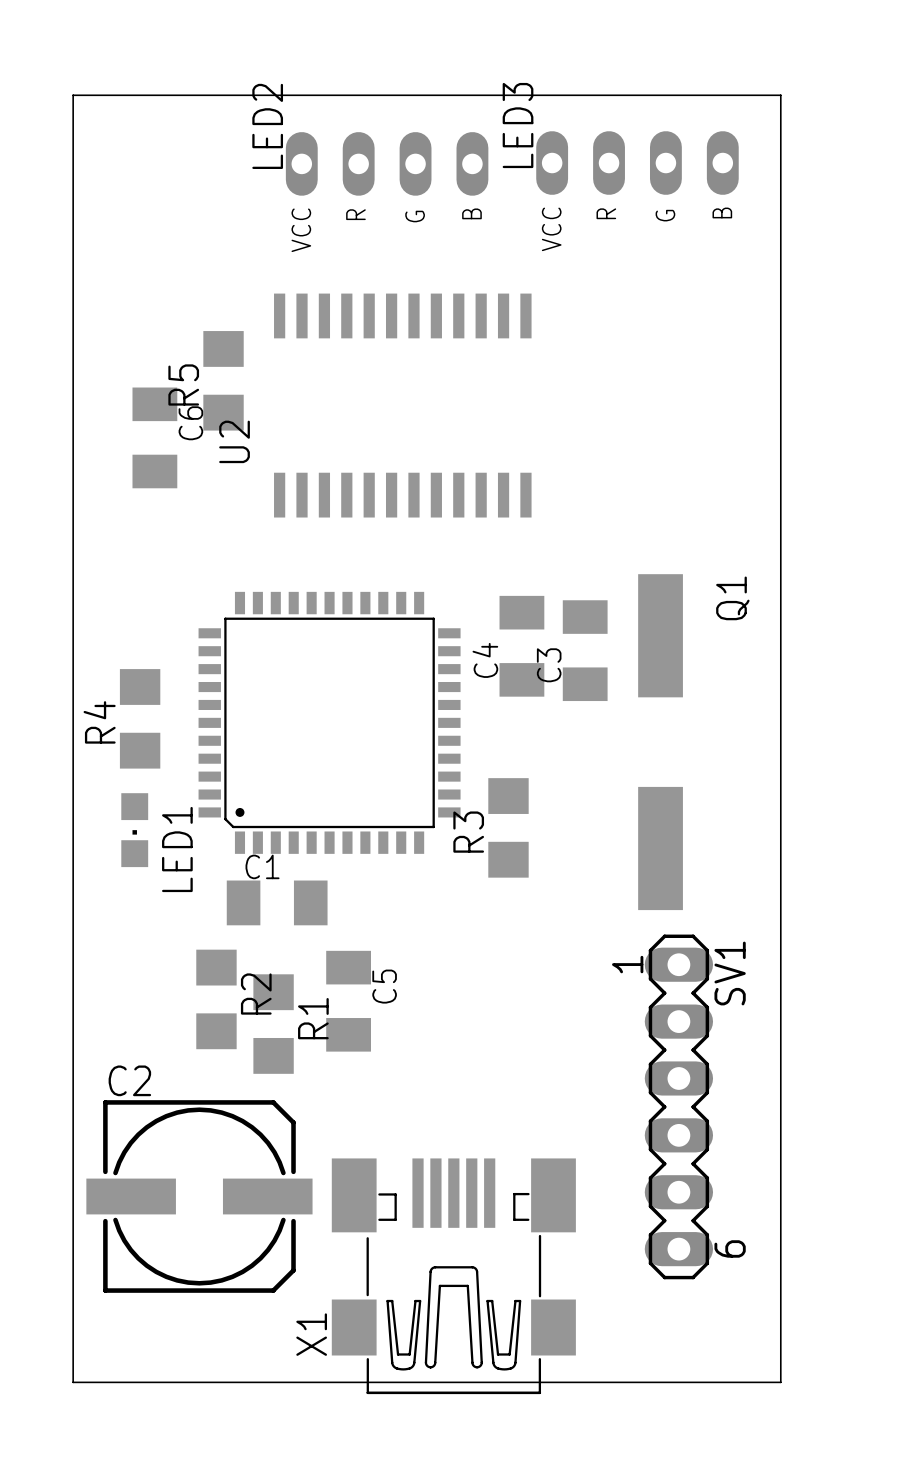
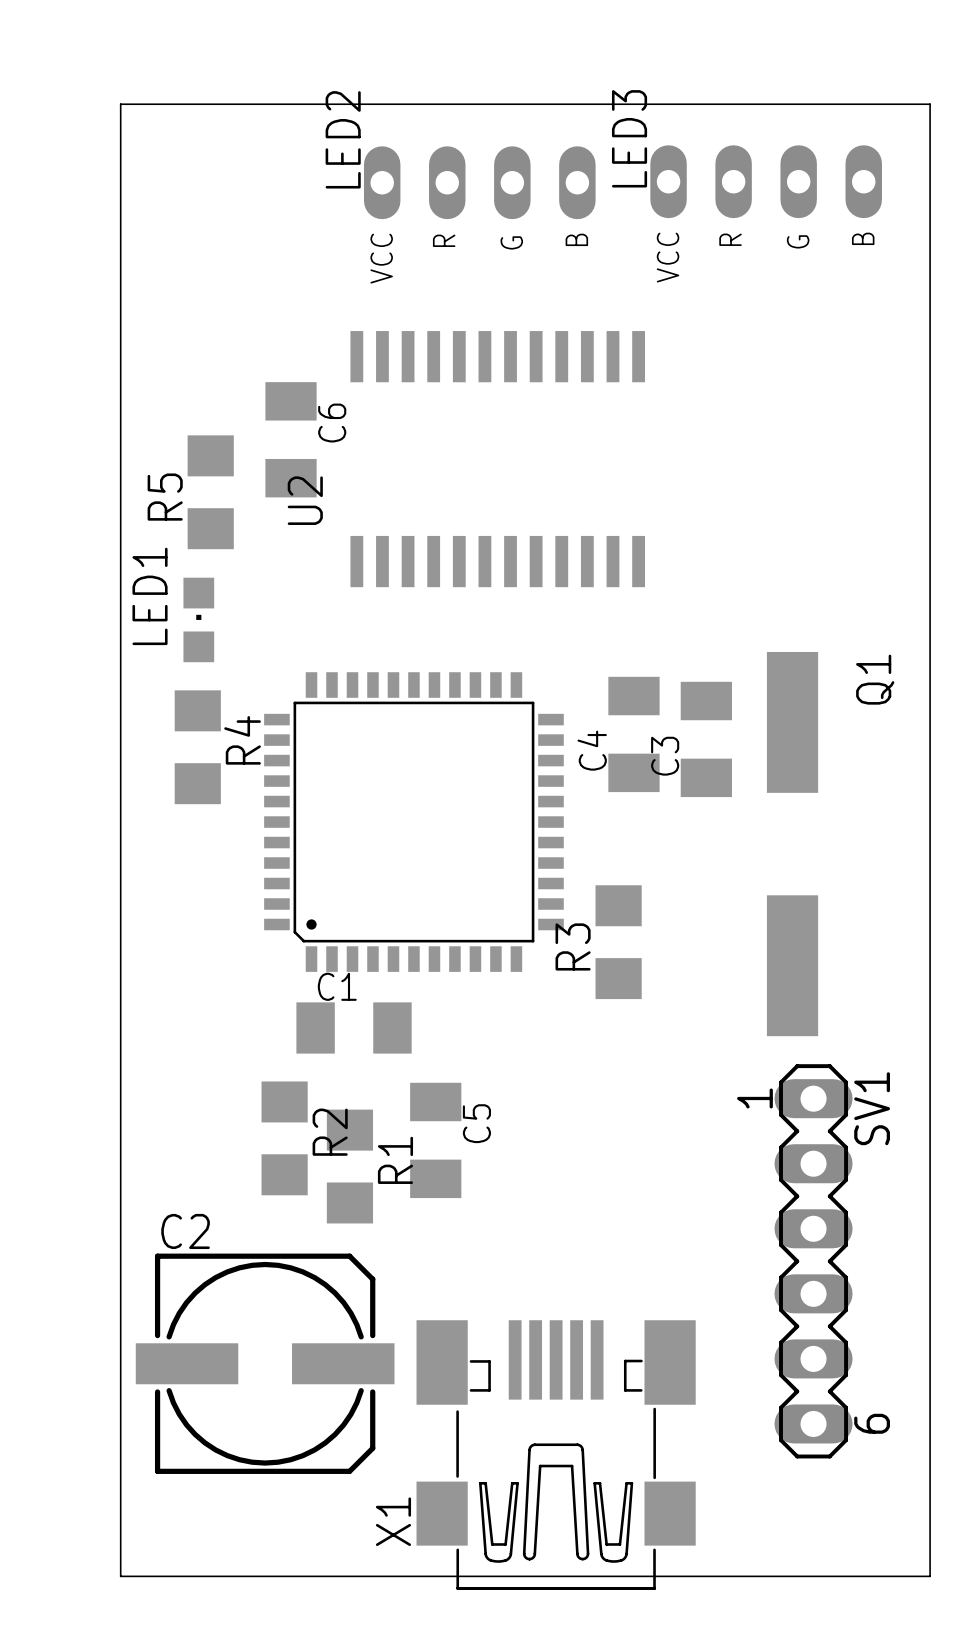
R5 position: (223, 380) -> (210, 492)
C6 position: (154, 437) -> (291, 439)
R4 position: (140, 718) -> (197, 747)
R4 name position: R4 (99, 722) -> R4 (242, 740)
LED1 rotation: 0° (134, 830) -> 180° (198, 619)
LED1 position: (134, 830) -> (198, 619)

